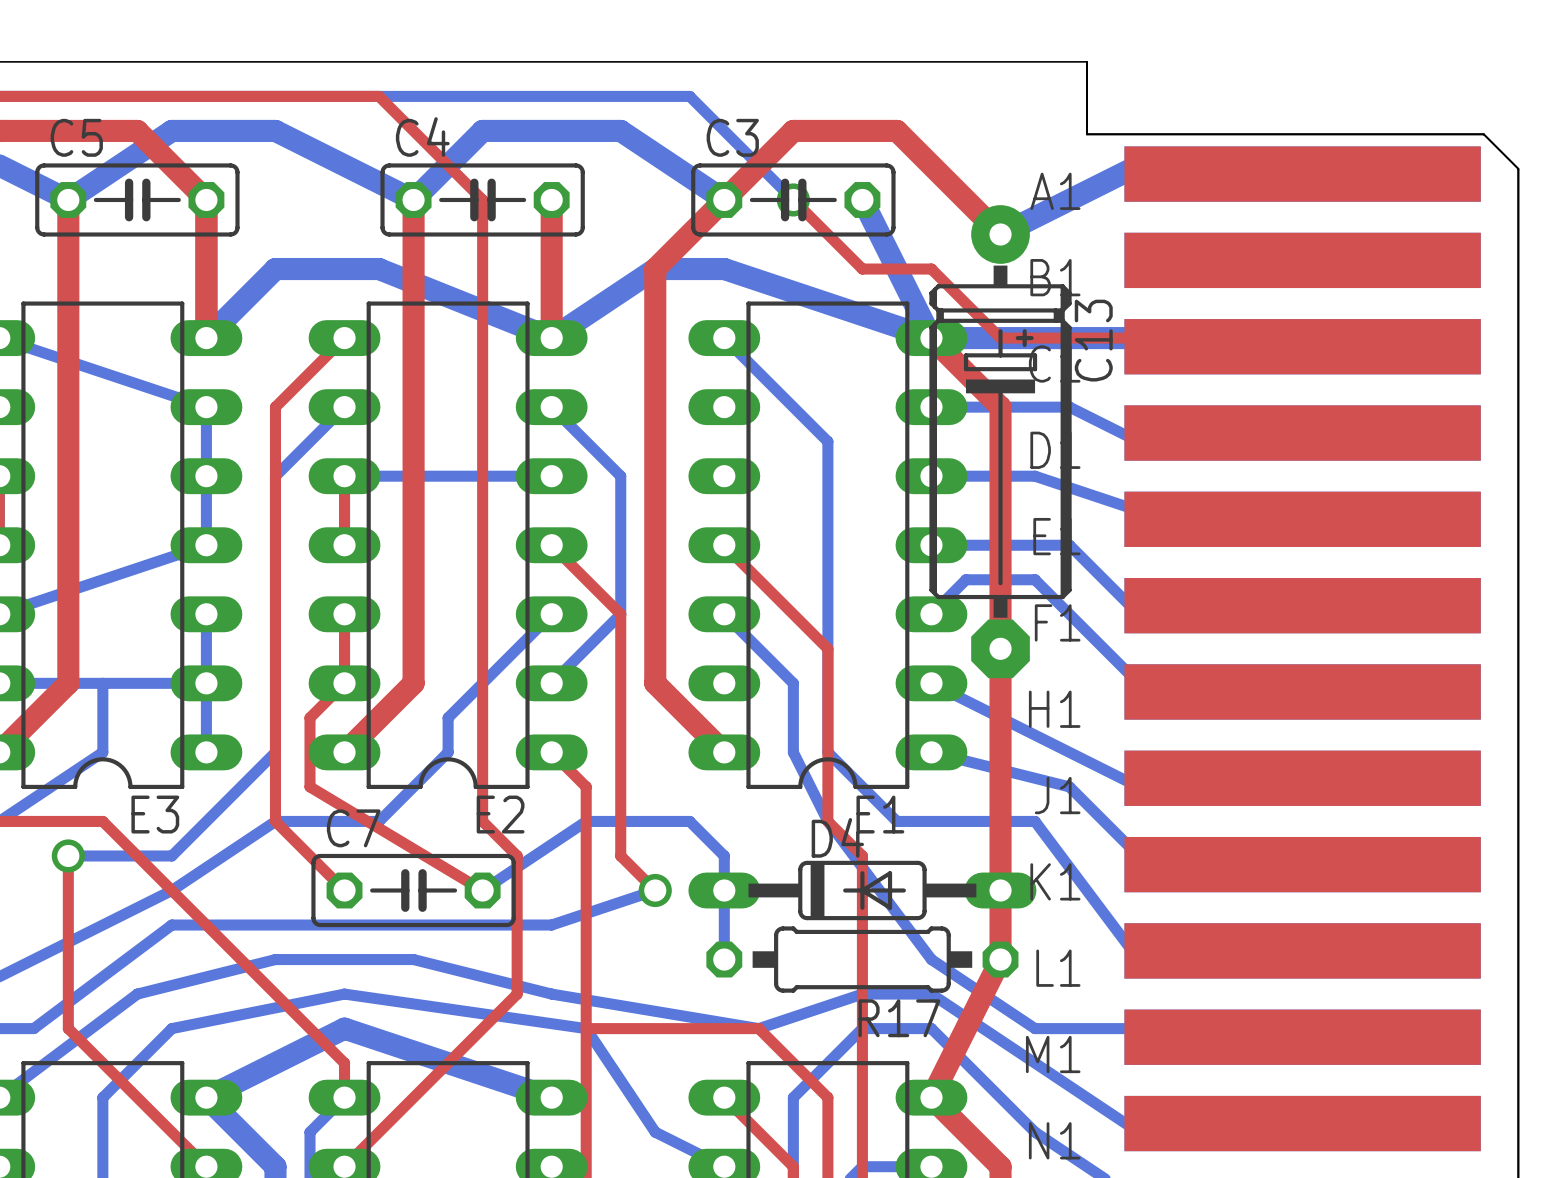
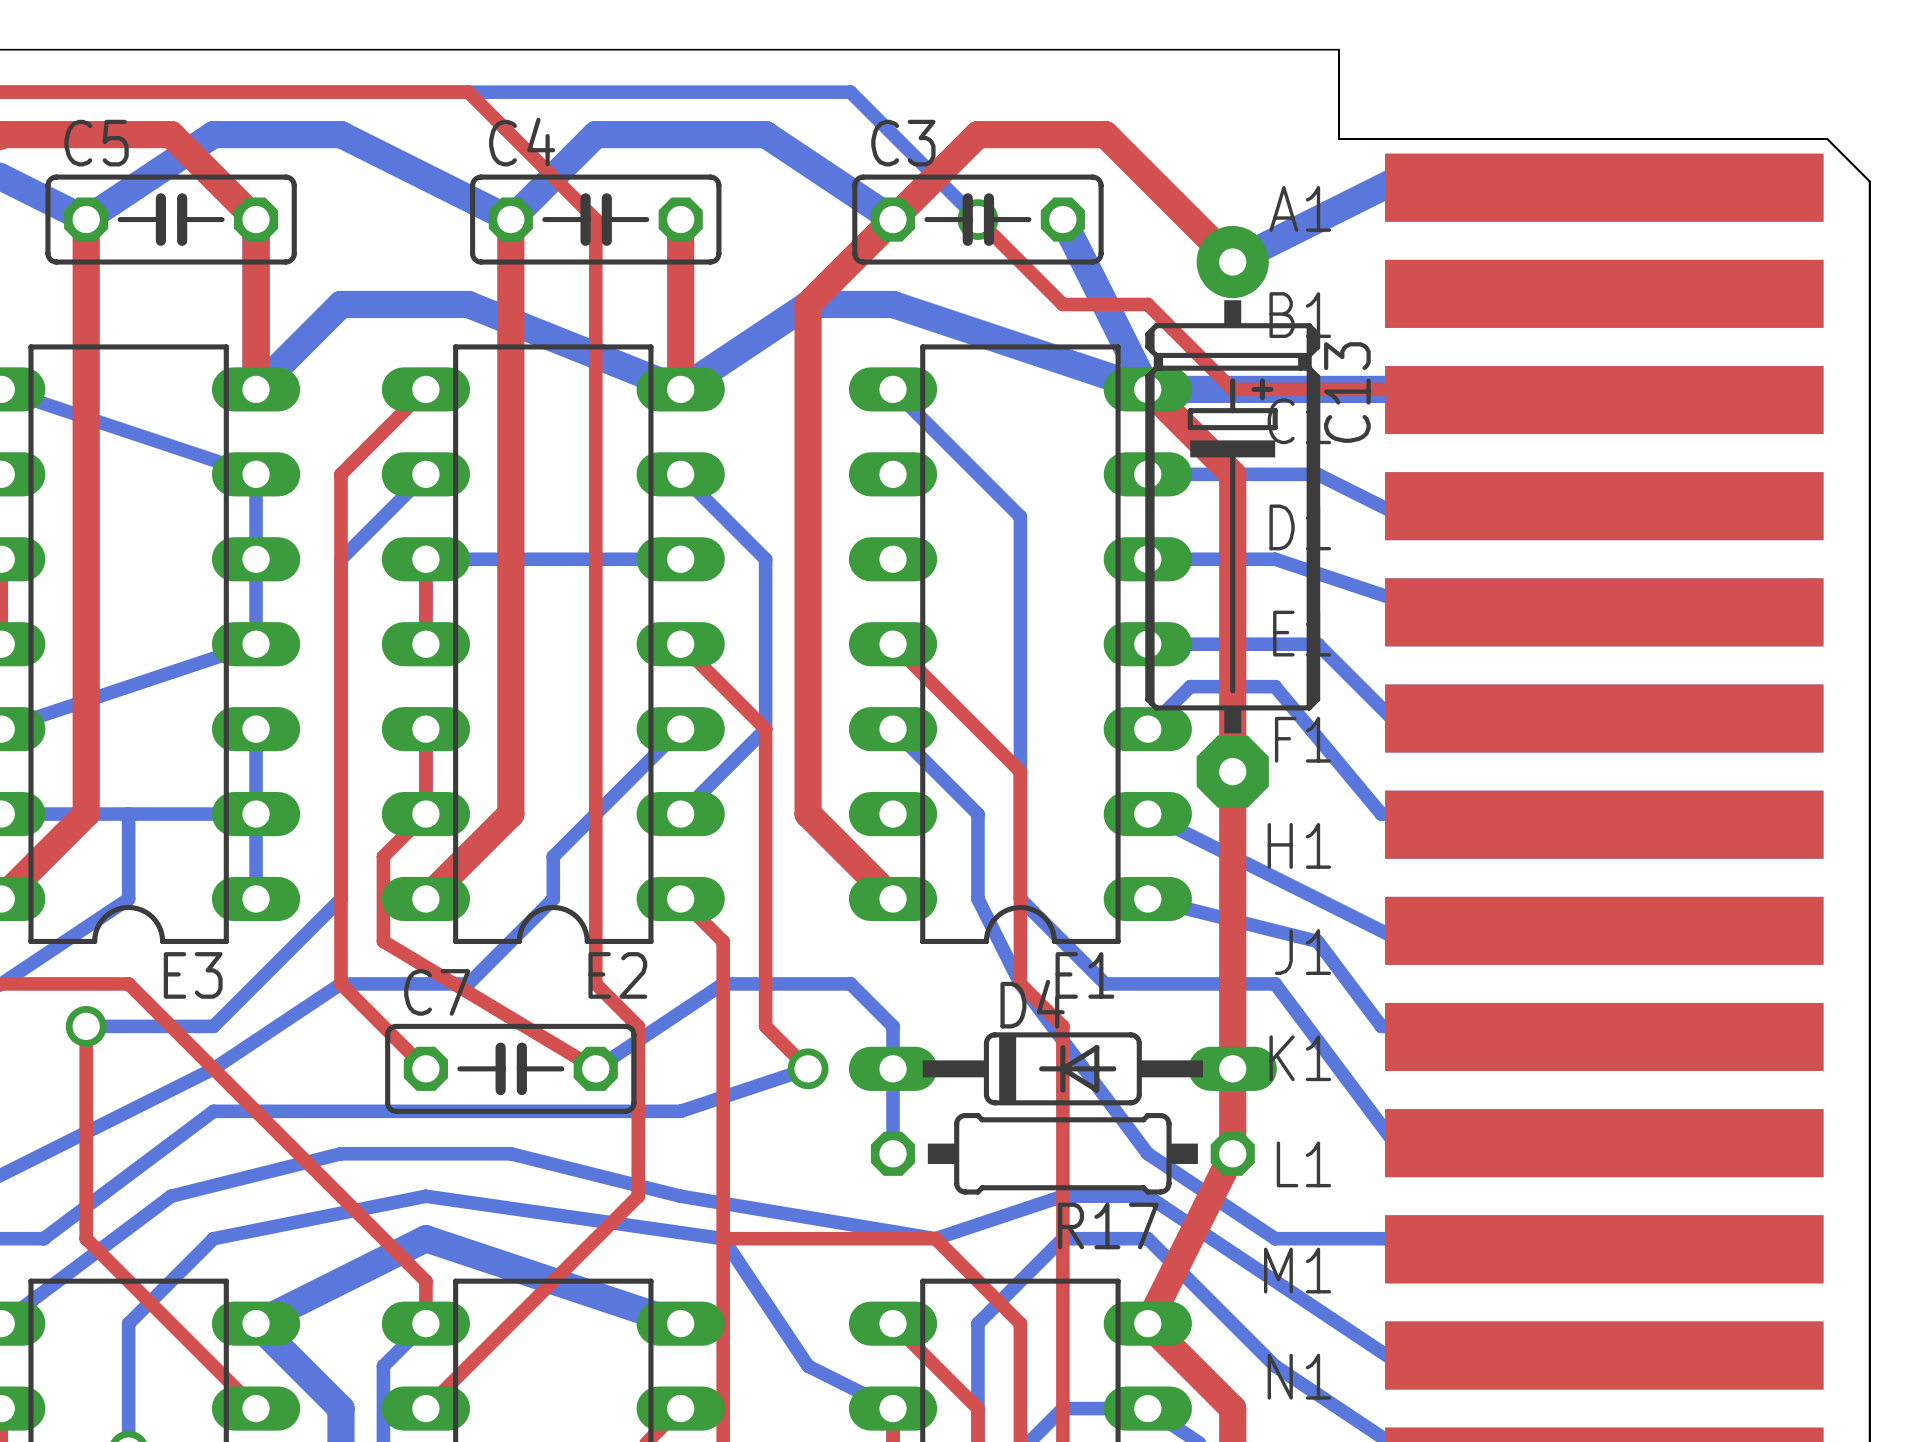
bottom track: (1035, 579) (1138, 683) -> (1275, 686) (1381, 814) (1402, 814)
bottom track: (1069, 786) (1138, 855) -> (1317, 941) (1381, 1026) (1402, 1026)

